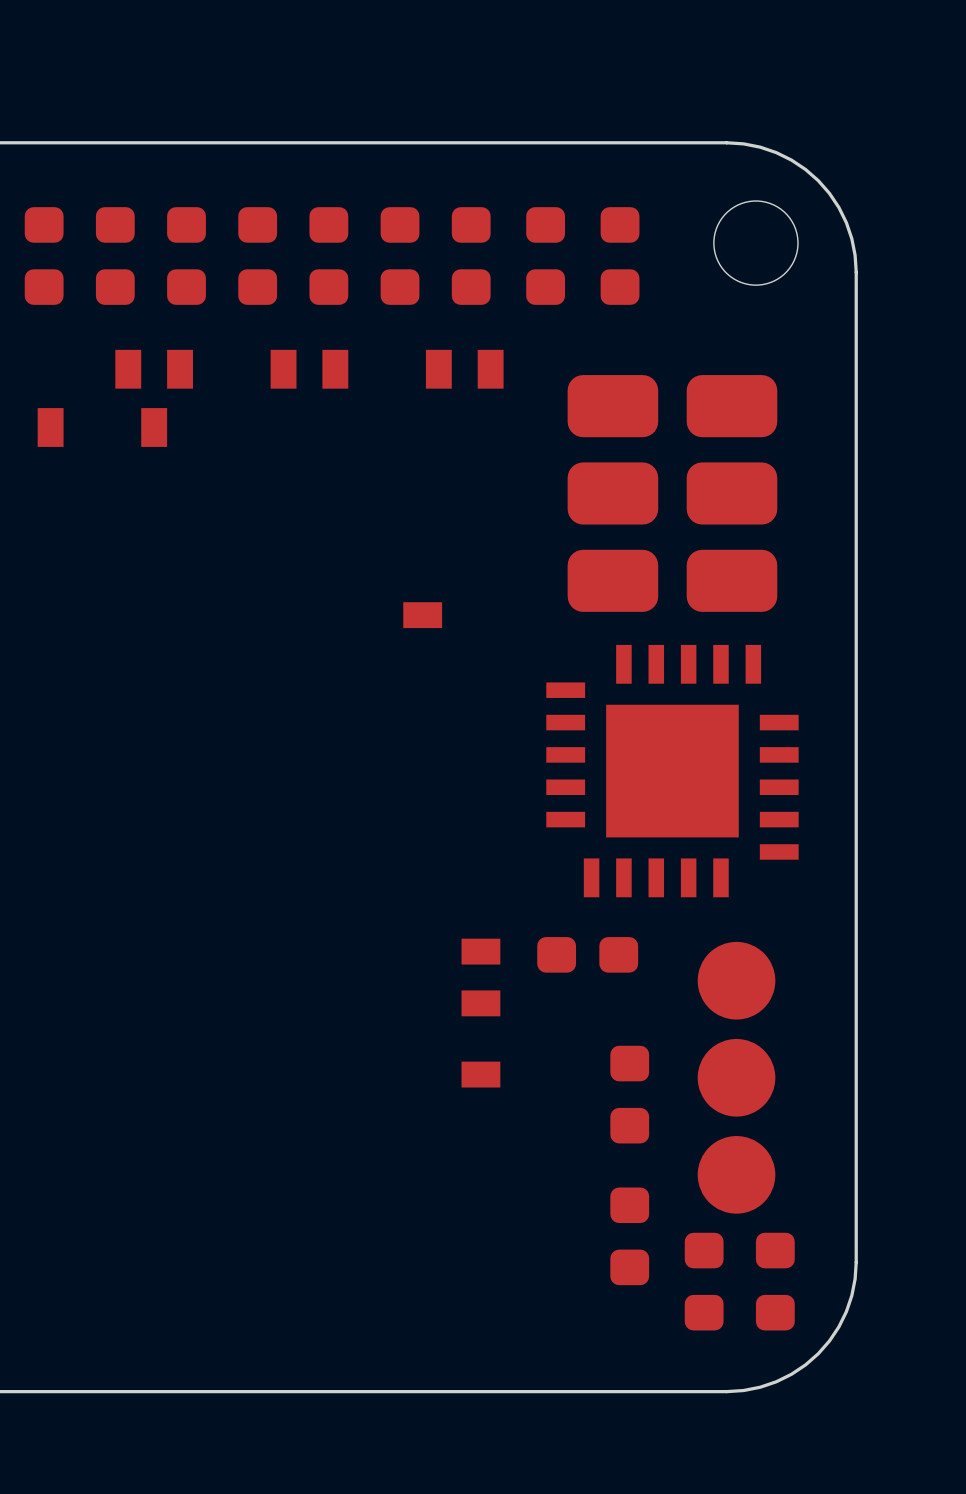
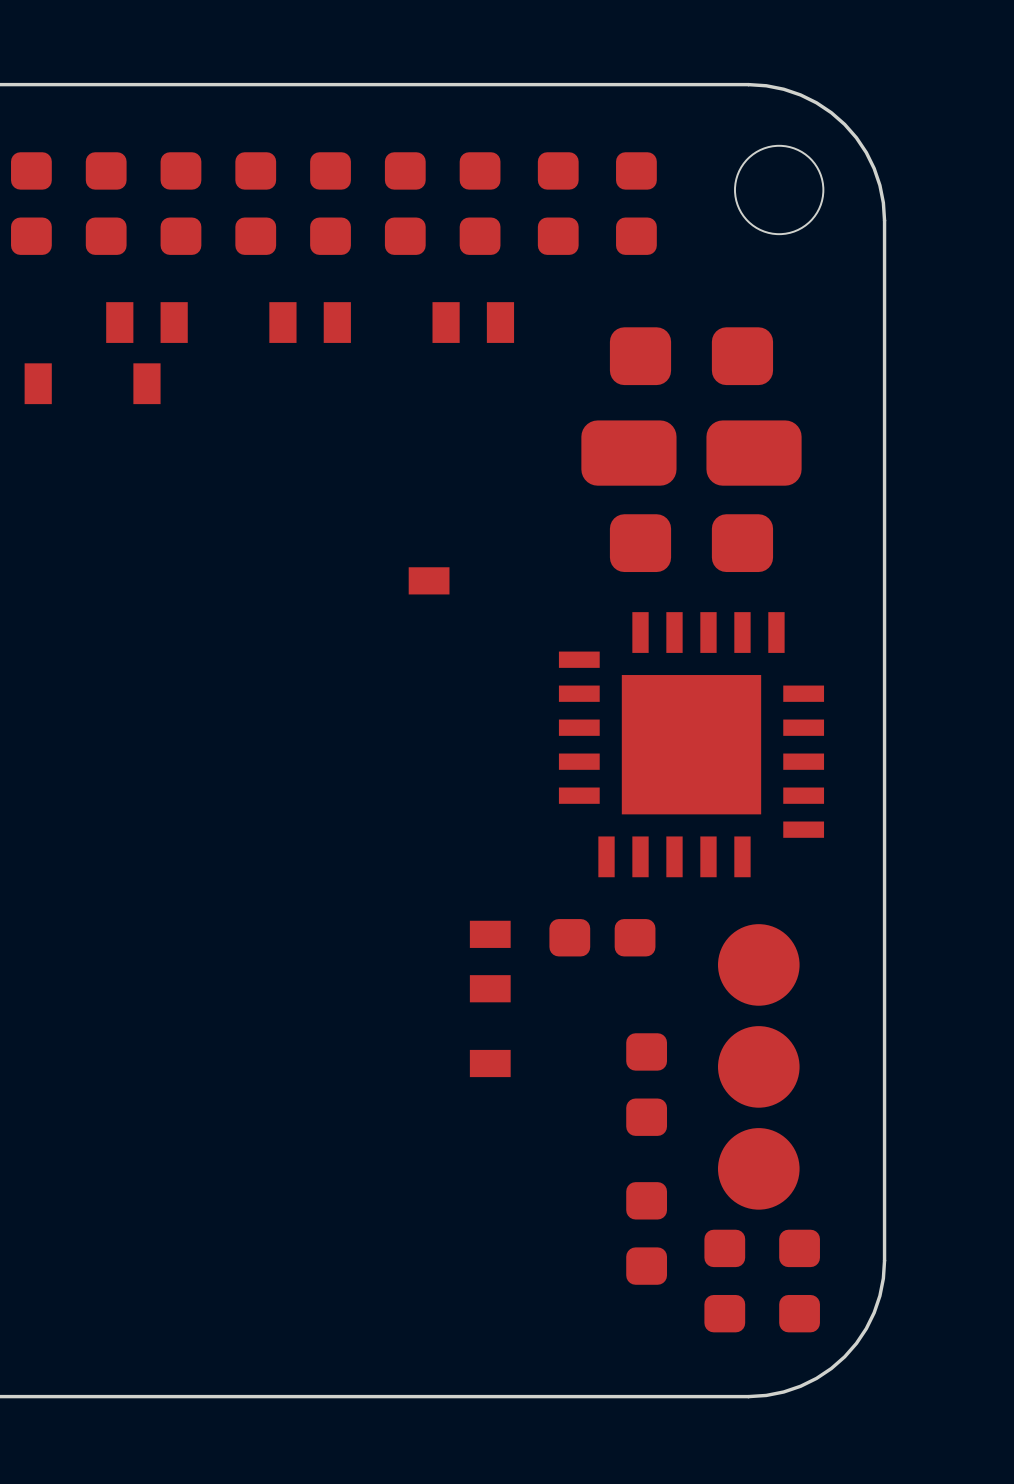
part footprint: [567, 375, 778, 438] -> [609, 327, 774, 386]
part footprint: [567, 549, 778, 612] -> [609, 514, 774, 573]

